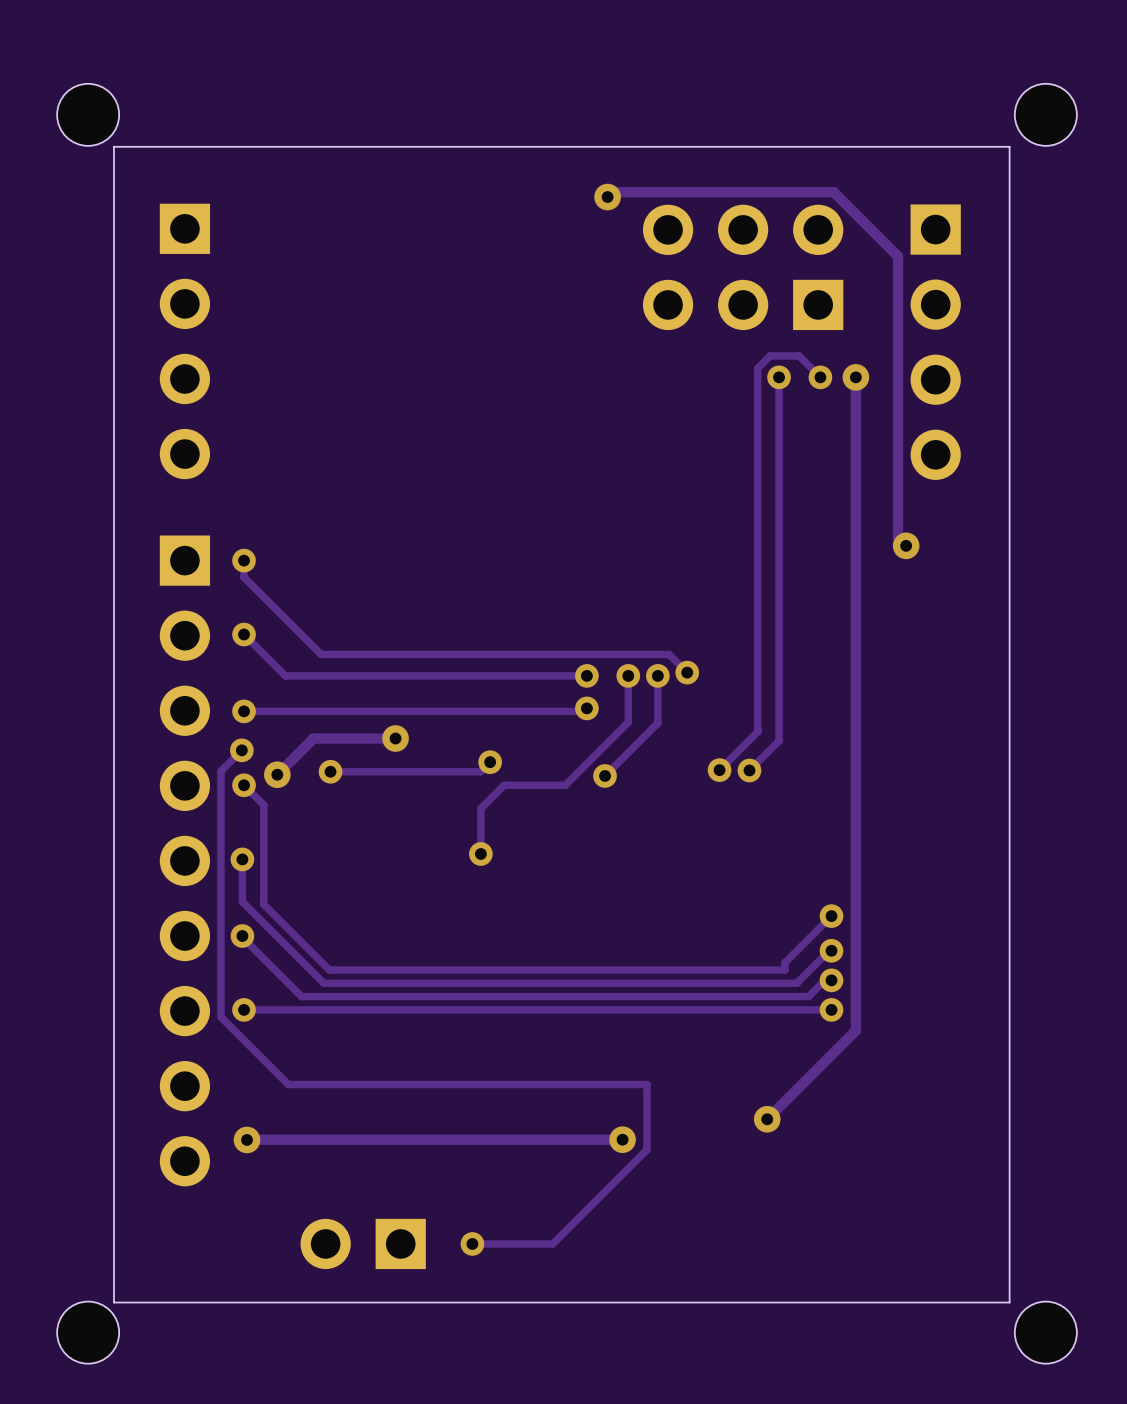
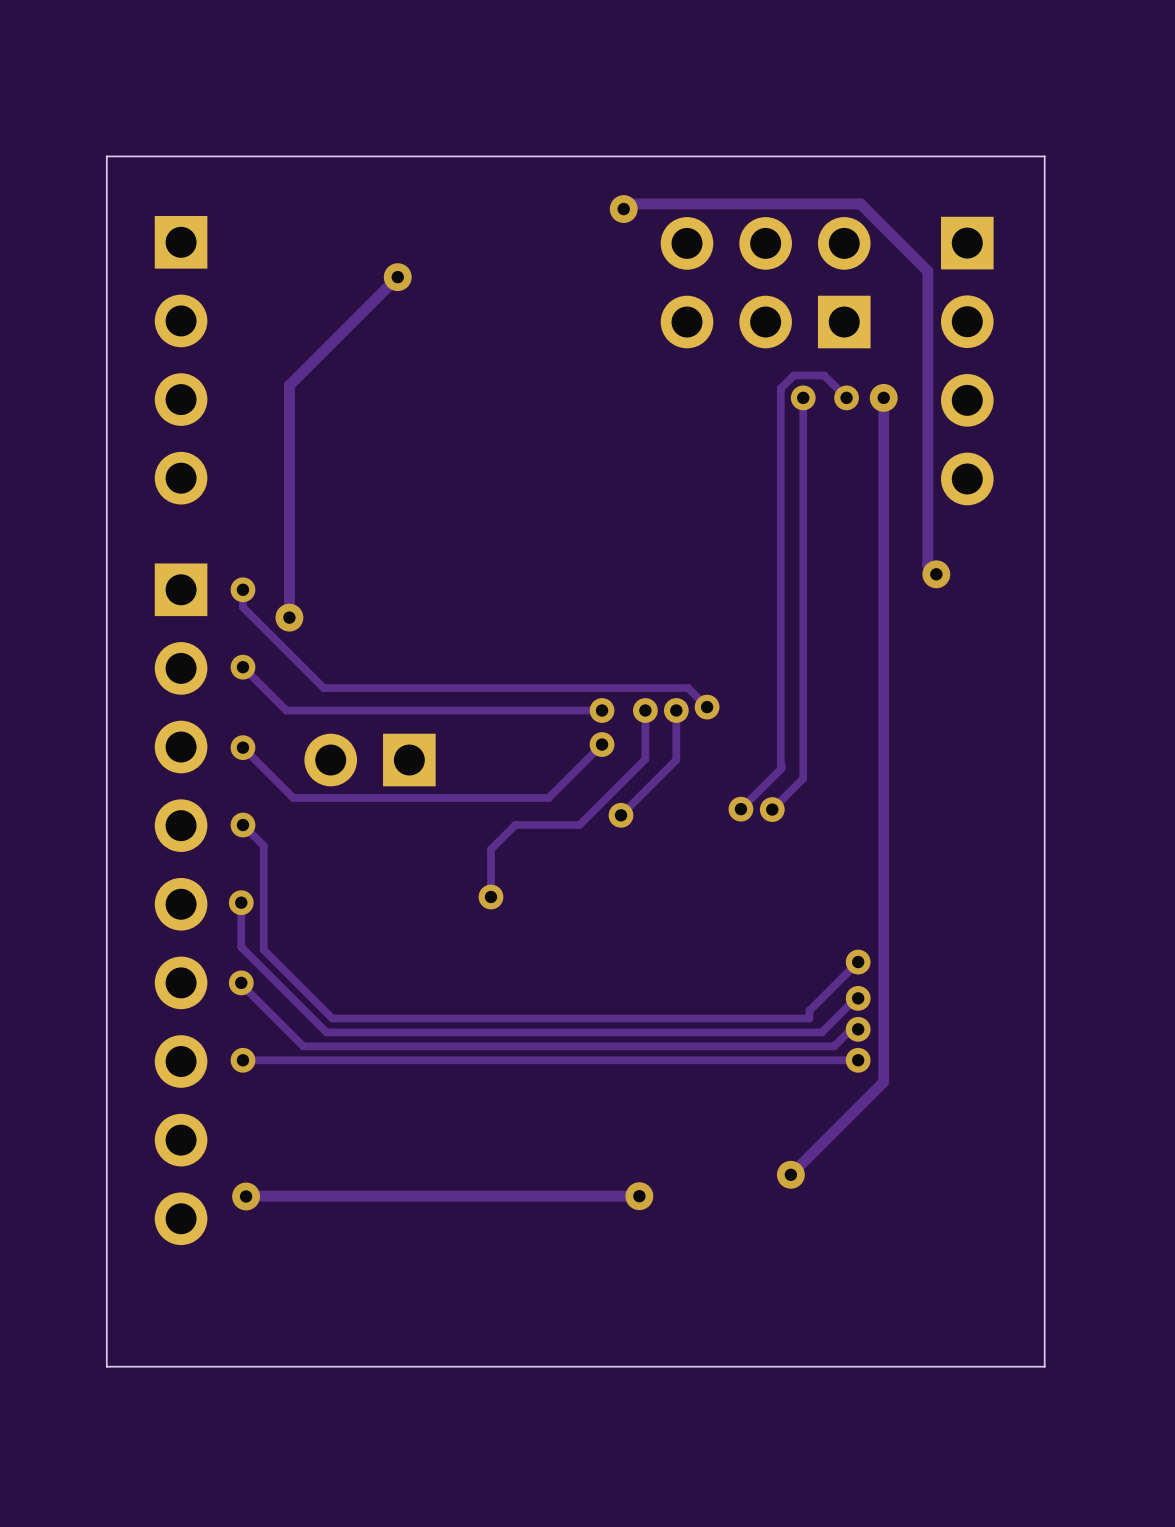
part: (88, 114) -> none
part: (1045, 114) -> none
track: none -> (397, 277) (289, 385) (289, 617)
via: none -> (397, 277)
via: none -> (289, 617)
track: (586, 708) (583, 711) (244, 711) -> (602, 744) (548, 797) (293, 797) (242, 747)
track: (395, 738) (313, 738) (277, 774) -> none
via: (395, 738) -> none
track: (241, 750) (220, 771) (220, 1017) (288, 1084) (646, 1084) (646, 1149) (552, 1243) (472, 1243) -> none
via: (241, 750) -> none
track: (490, 762) (480, 771) (330, 771) -> none
via: (490, 762) -> none
via: (330, 771) -> none
via: (277, 774) -> none
part position: (363, 1243) -> (370, 760)
via: (472, 1243) -> none
part: (88, 1332) -> none
part: (1045, 1332) -> none

